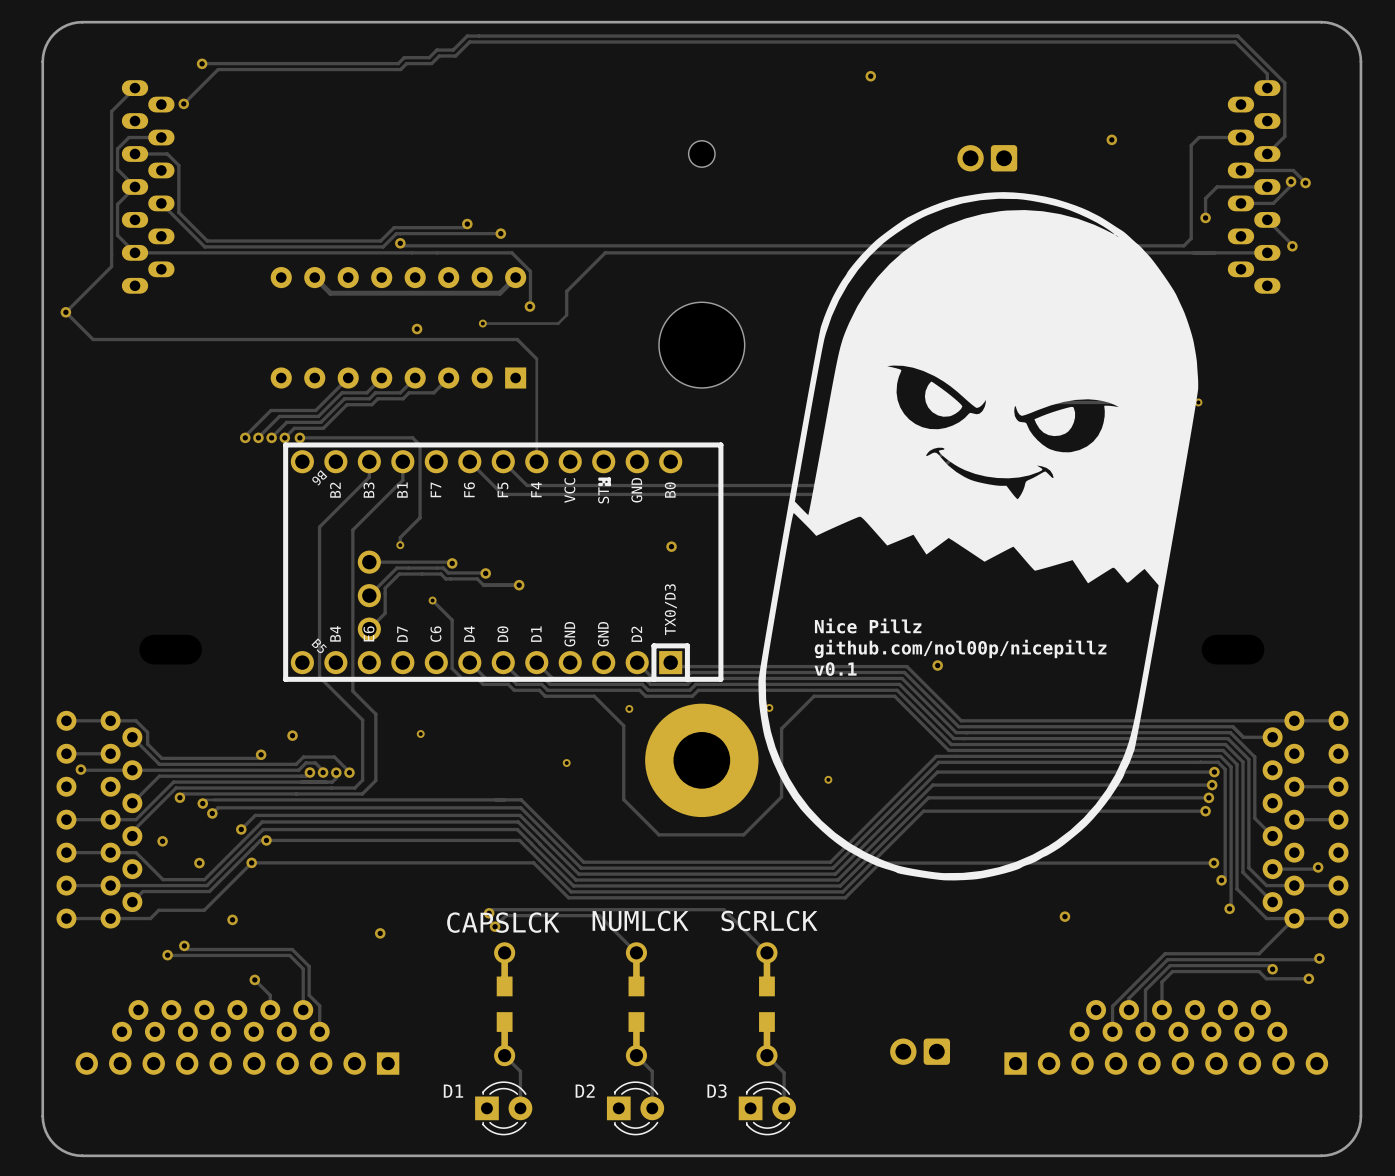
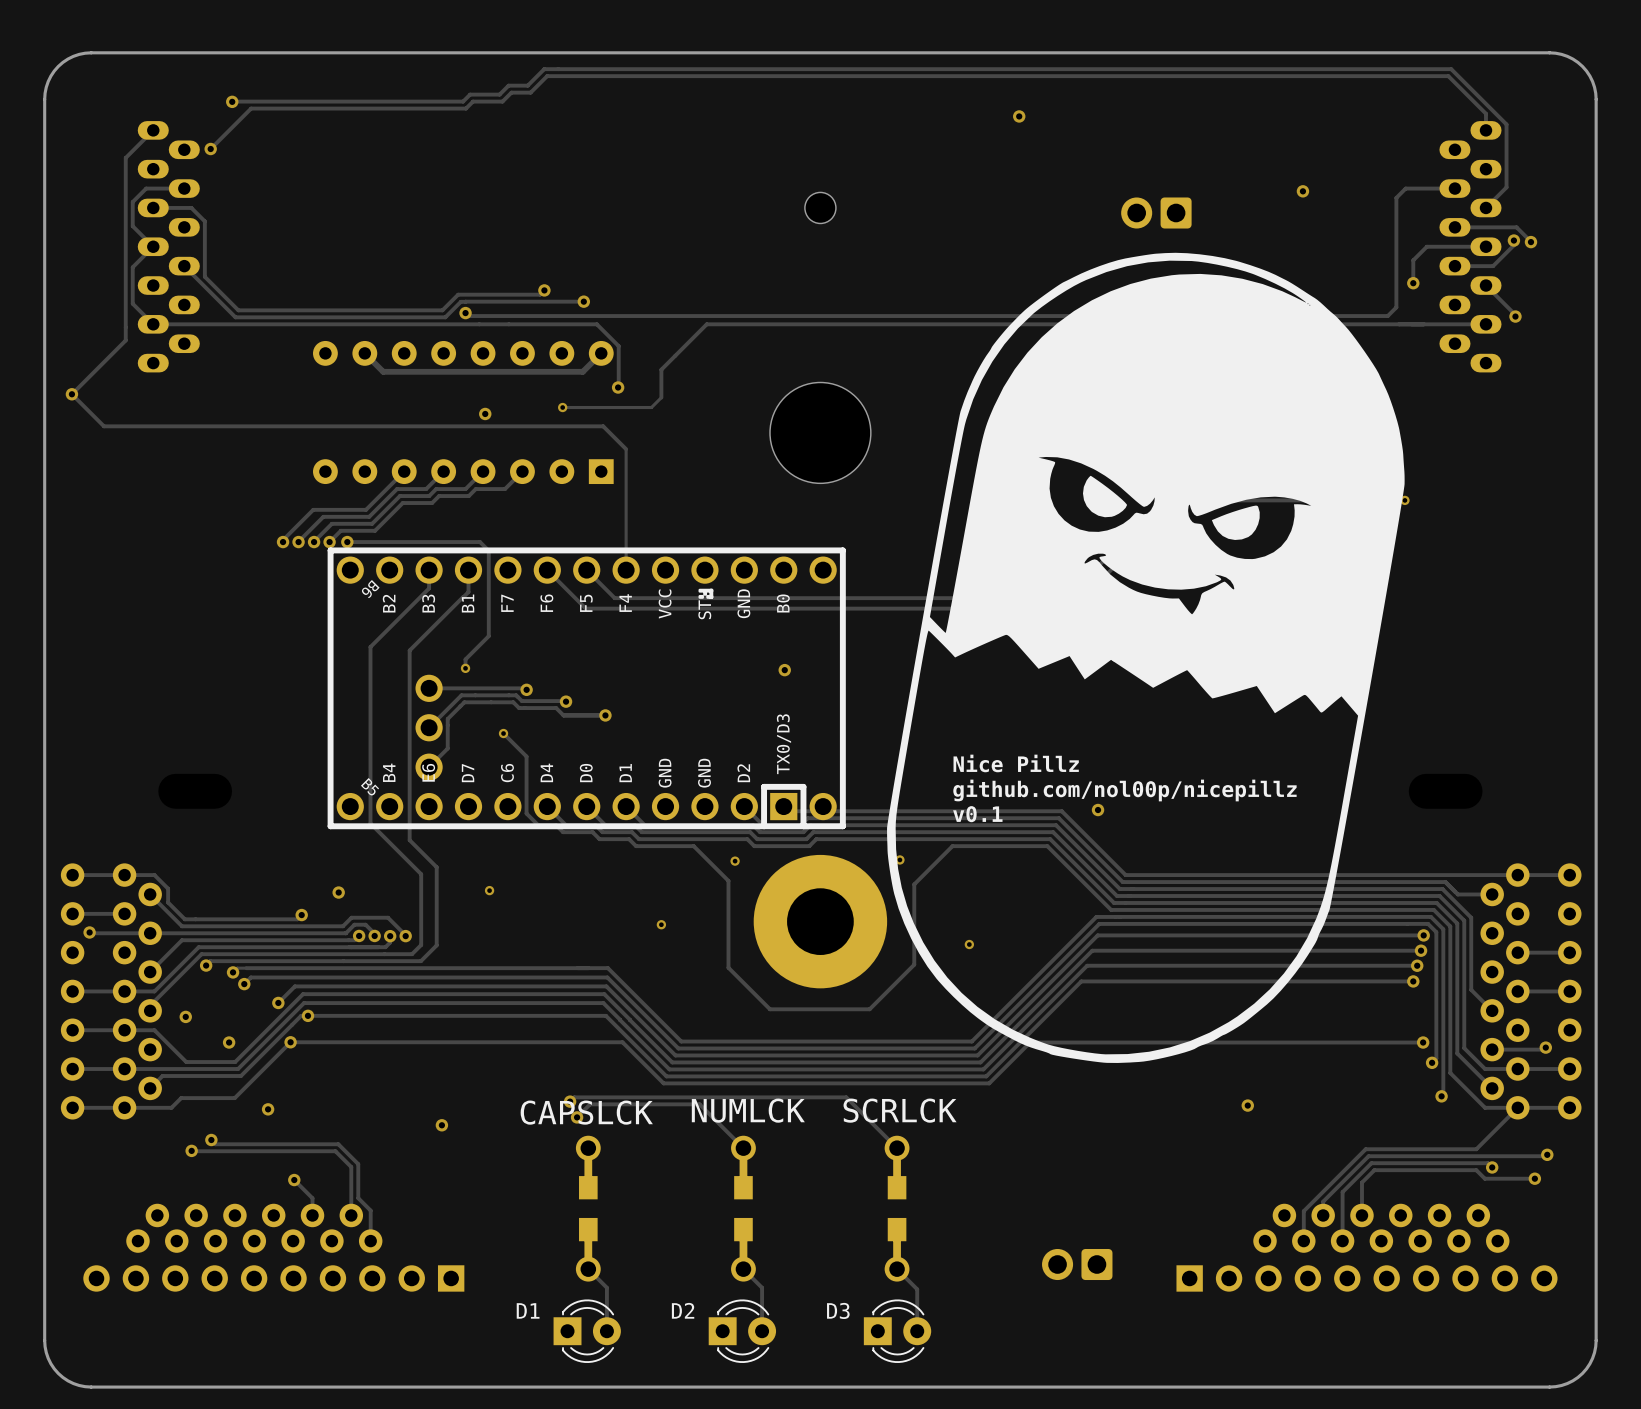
part: none -> (823, 570)
part: none -> (823, 806)

